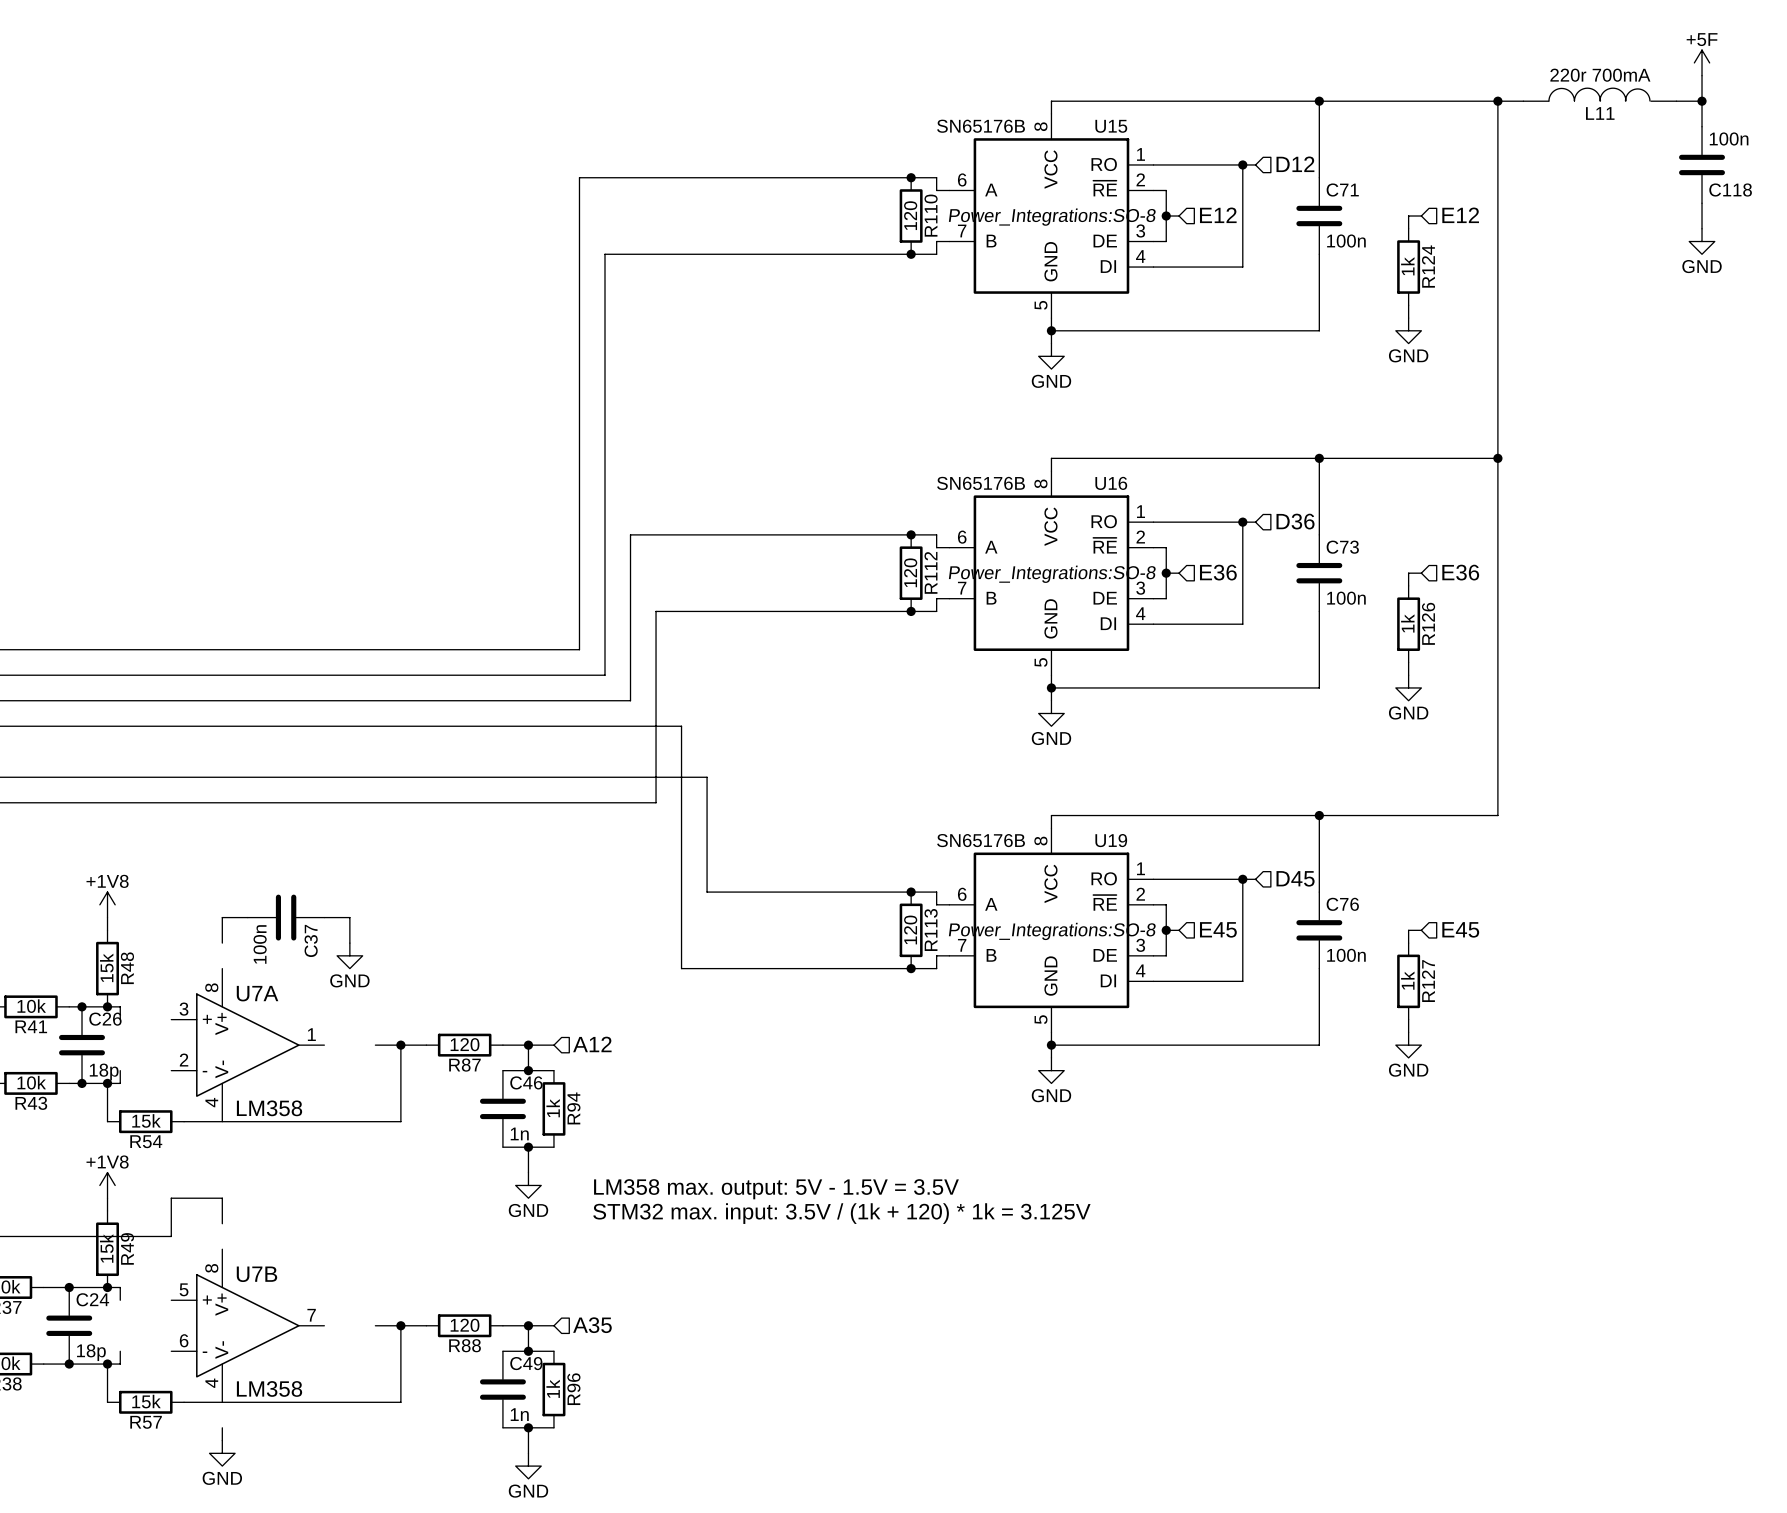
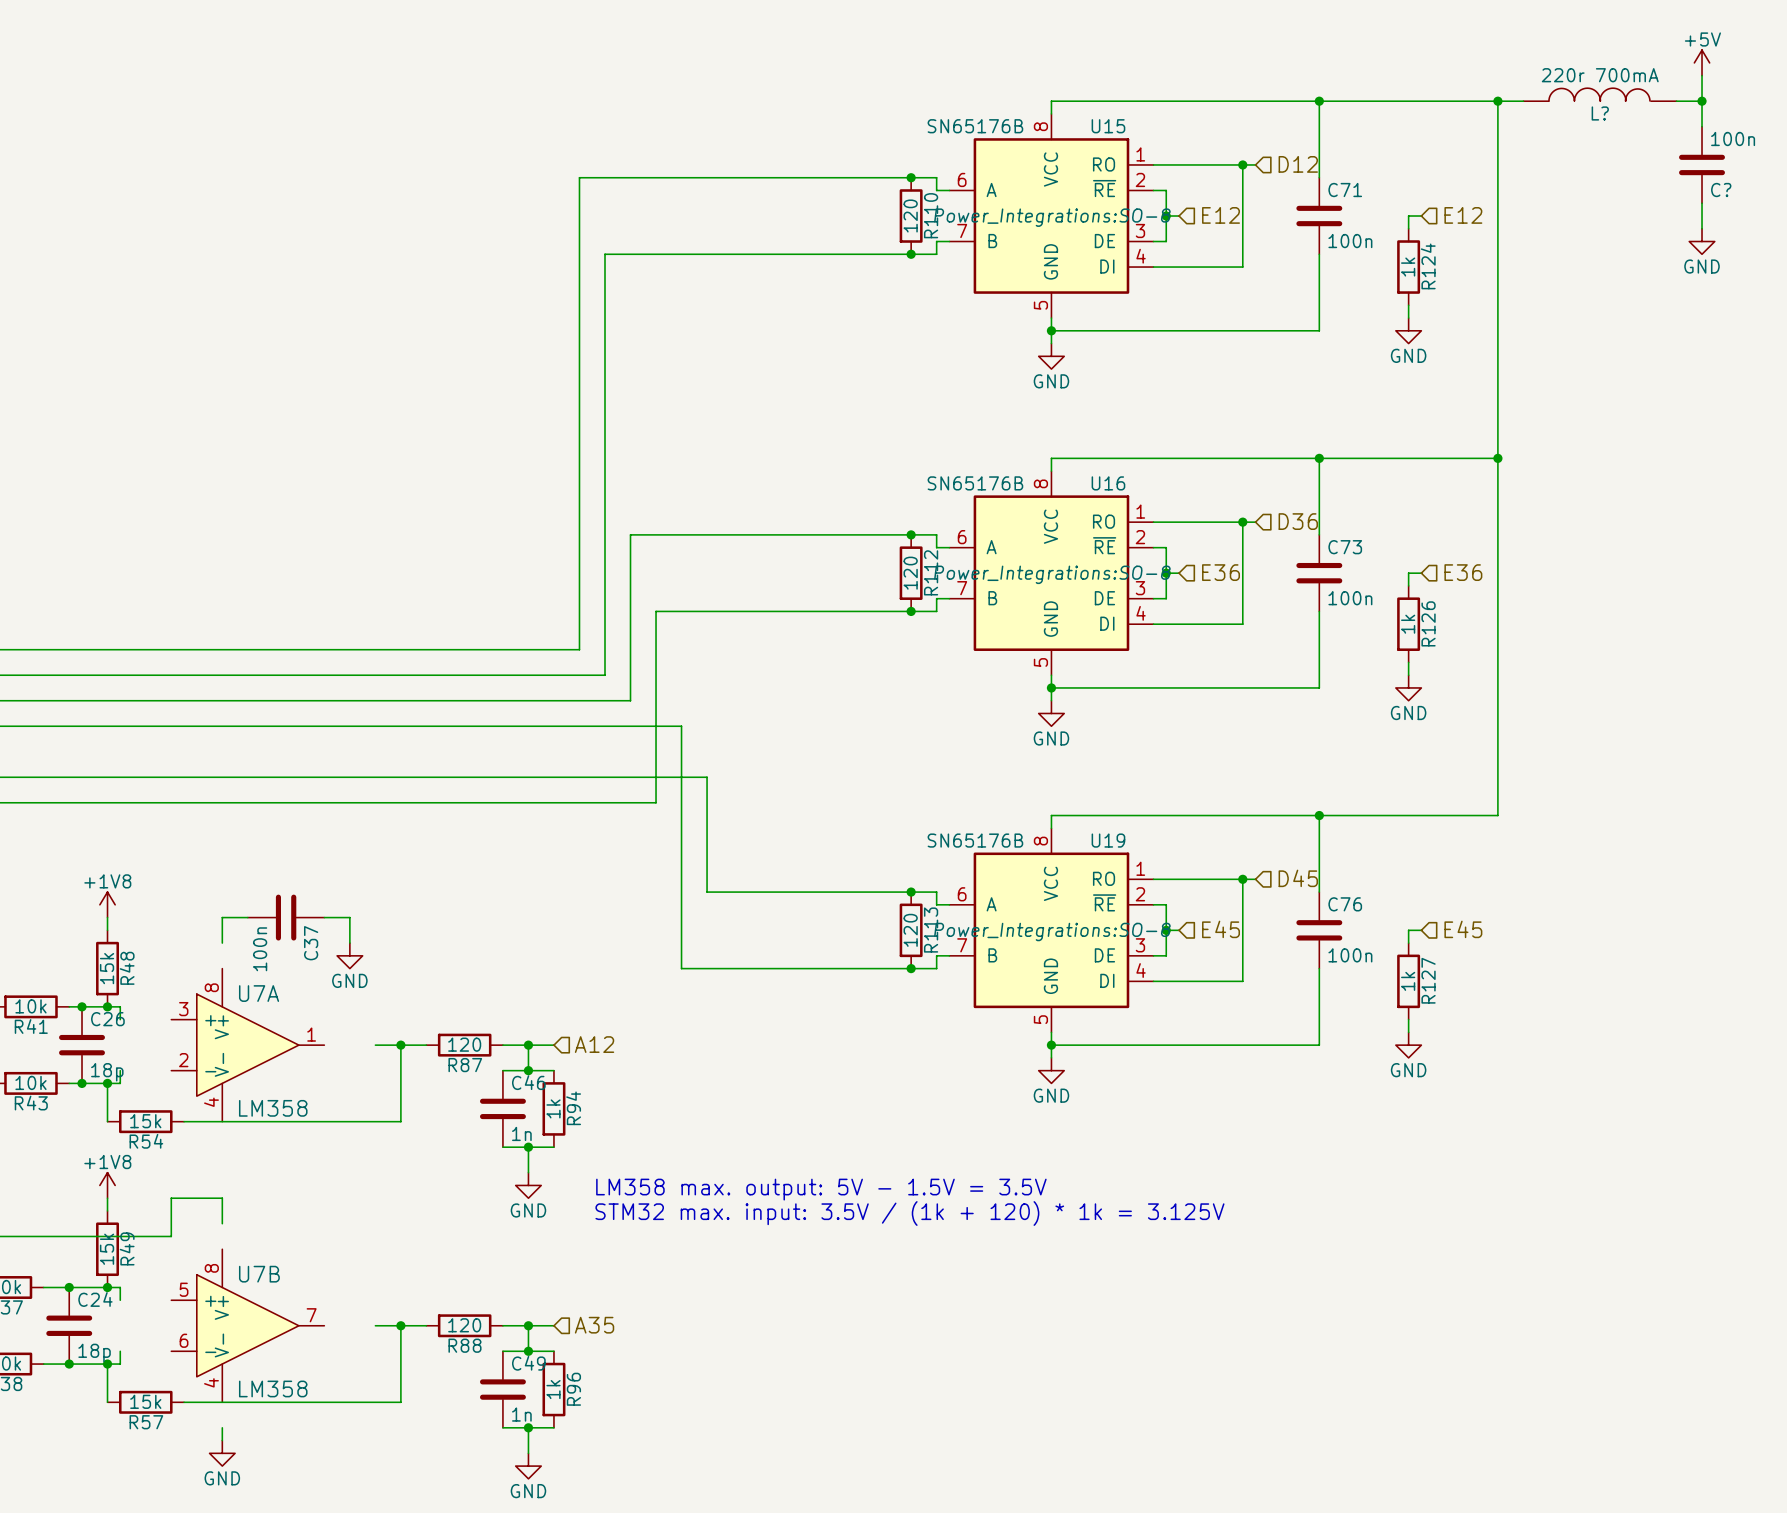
power symbol: +5F (1702, 62) -> +5V (1702, 62)
L11 name: L11 (1600, 113) -> L? (1600, 113)
C118 name: C118 (1730, 190) -> C? (1721, 190)

